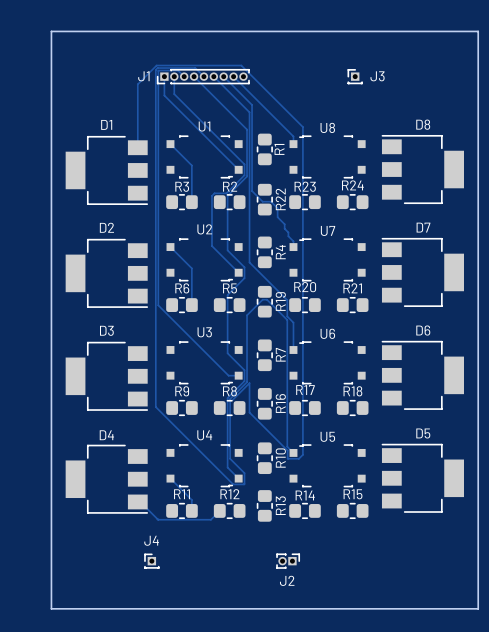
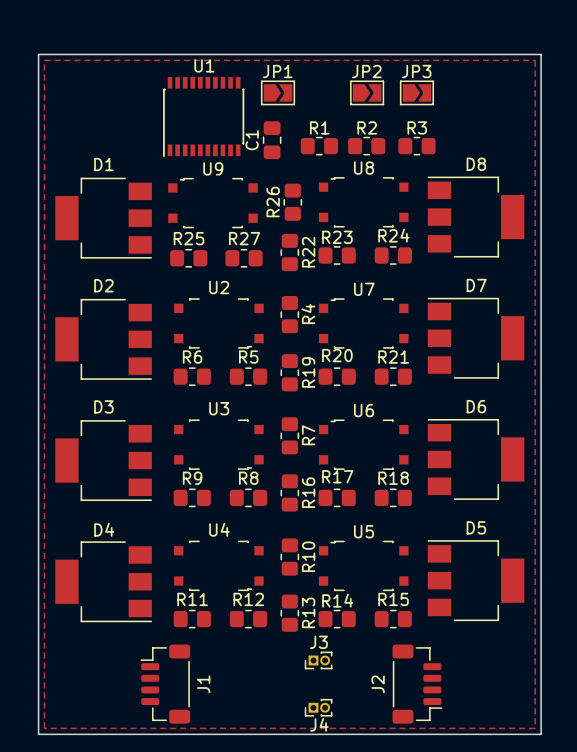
zone outline: none -> (44, 60) (44, 728) (535, 728) (535, 60) (44, 60)
JP1: none -> (278, 92)
JP2: none -> (367, 92)
JP3: none -> (416, 92)
J1 footprint: [157, 69, 250, 85] -> [140, 644, 191, 724]
J3 footprint: [347, 69, 363, 84] -> [304, 651, 333, 670]
J1 name position: J1 (143, 76) -> J1 (203, 684)
track: (164, 76) (164, 95) (238, 169) -> none
track: (174, 76) (174, 94) (244, 164) (244, 175) (226, 193) (214, 193) (211, 195) (211, 246) (238, 272) -> none
track: (184, 76) (178, 70) (158, 70) (158, 305) (228, 375) (238, 375) -> none
track: (194, 76) (247, 129) (247, 176) (227, 195) (227, 250) (244, 267) (244, 278) (227, 295) (227, 353) (244, 370) (244, 381) (227, 398) (227, 467) (238, 478) -> none
track: (203, 76) (195, 68) (157, 68) (155, 69) (155, 407) (233, 484) (244, 484) (244, 473) (230, 458) (230, 399) (247, 382) (247, 315) (262, 299) (266, 299) (287, 320) (287, 446) (293, 452) -> none
track: (213, 76) (249, 112) (249, 262) (287, 300) (287, 316) (293, 322) (293, 350) -> none
track: (223, 76) (252, 104) (252, 191) (262, 201) (271, 201) (277, 208) (277, 217) (284, 224) (288, 236) (293, 241) (293, 247) -> none
track: (233, 76) (293, 136) (293, 144) -> none
J3 name position: J3 (377, 76) -> J3 (318, 642)
C1: none -> (272, 140)
U1 footprint: [166, 135, 243, 179] -> [163, 76, 245, 157]
track: (170, 144) (191, 165) (191, 202) -> none
track: (137, 147) (137, 84) (156, 65) (241, 65) (302, 127) (302, 454) (298, 458) (288, 458) (287, 450) (249, 412) (249, 383) (232, 400) -> none
R1 rotation: 0° (264, 149) -> 90° clockwise (319, 146)
R1 position: (264, 149) -> (319, 146)
R1 name position: R1 (279, 149) -> R1 (319, 127)
R26: none -> (292, 202)
U9: none -> (212, 203)
R3 position: (181, 202) -> (416, 146)
R2 position: (229, 202) -> (366, 146)
R25: none -> (188, 258)
R27: none -> (244, 258)
track: (170, 247) (191, 268) (191, 305) -> none
track: (170, 478) (191, 499) (191, 510) -> none
track: (139, 500) (158, 519) (210, 519) (219, 510) -> none
J4 name position: J4 (151, 540) -> J4 (319, 724)
J4 footprint: [144, 553, 160, 569] -> [304, 698, 333, 717]
J2 footprint: [276, 553, 300, 569] -> [392, 644, 443, 724]
J2 name position: J2 (287, 580) -> J2 (378, 684)

